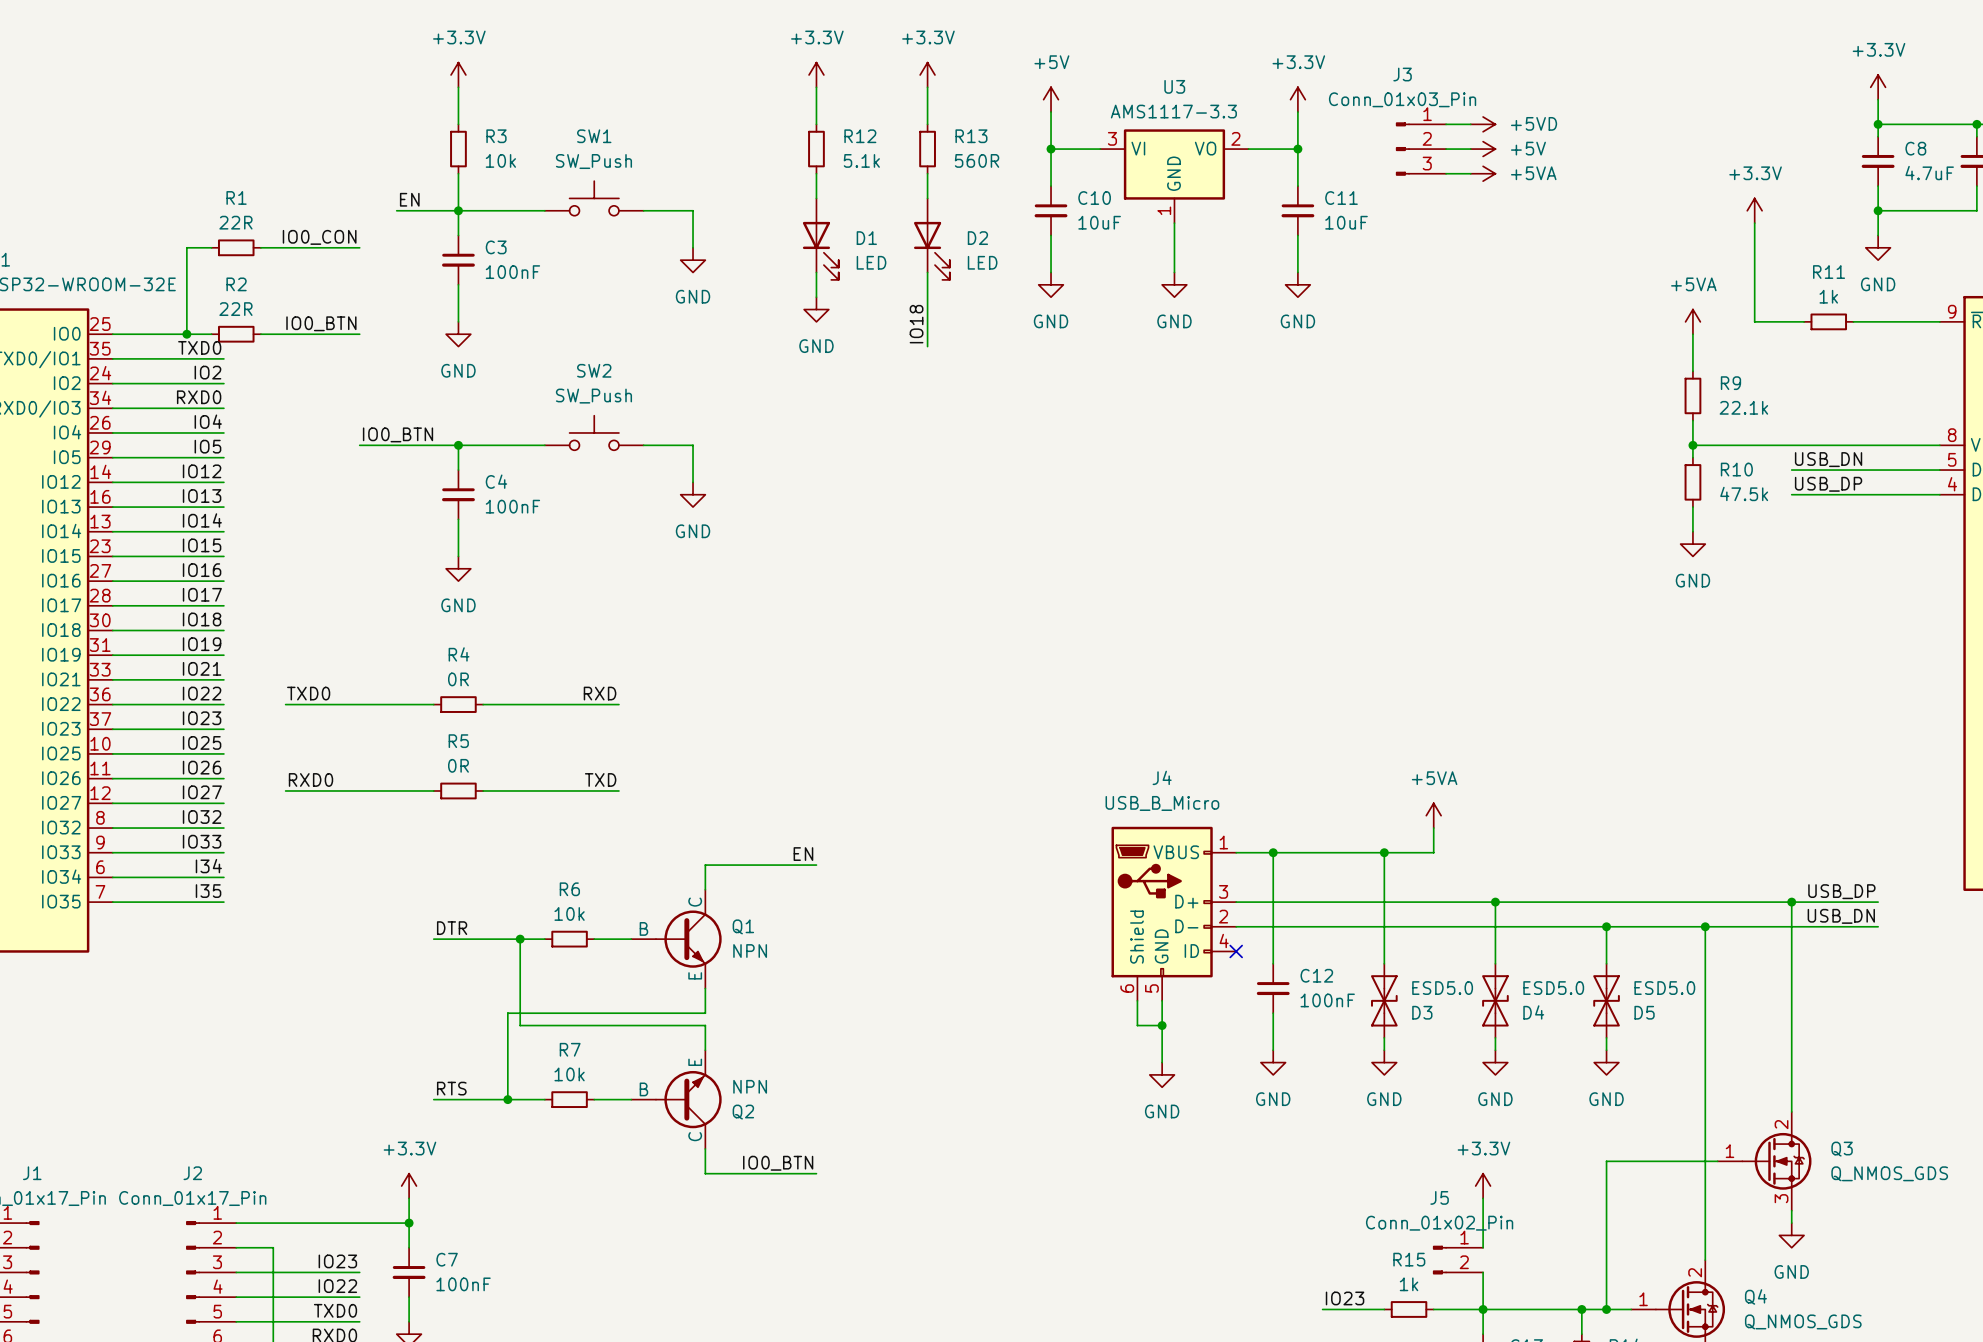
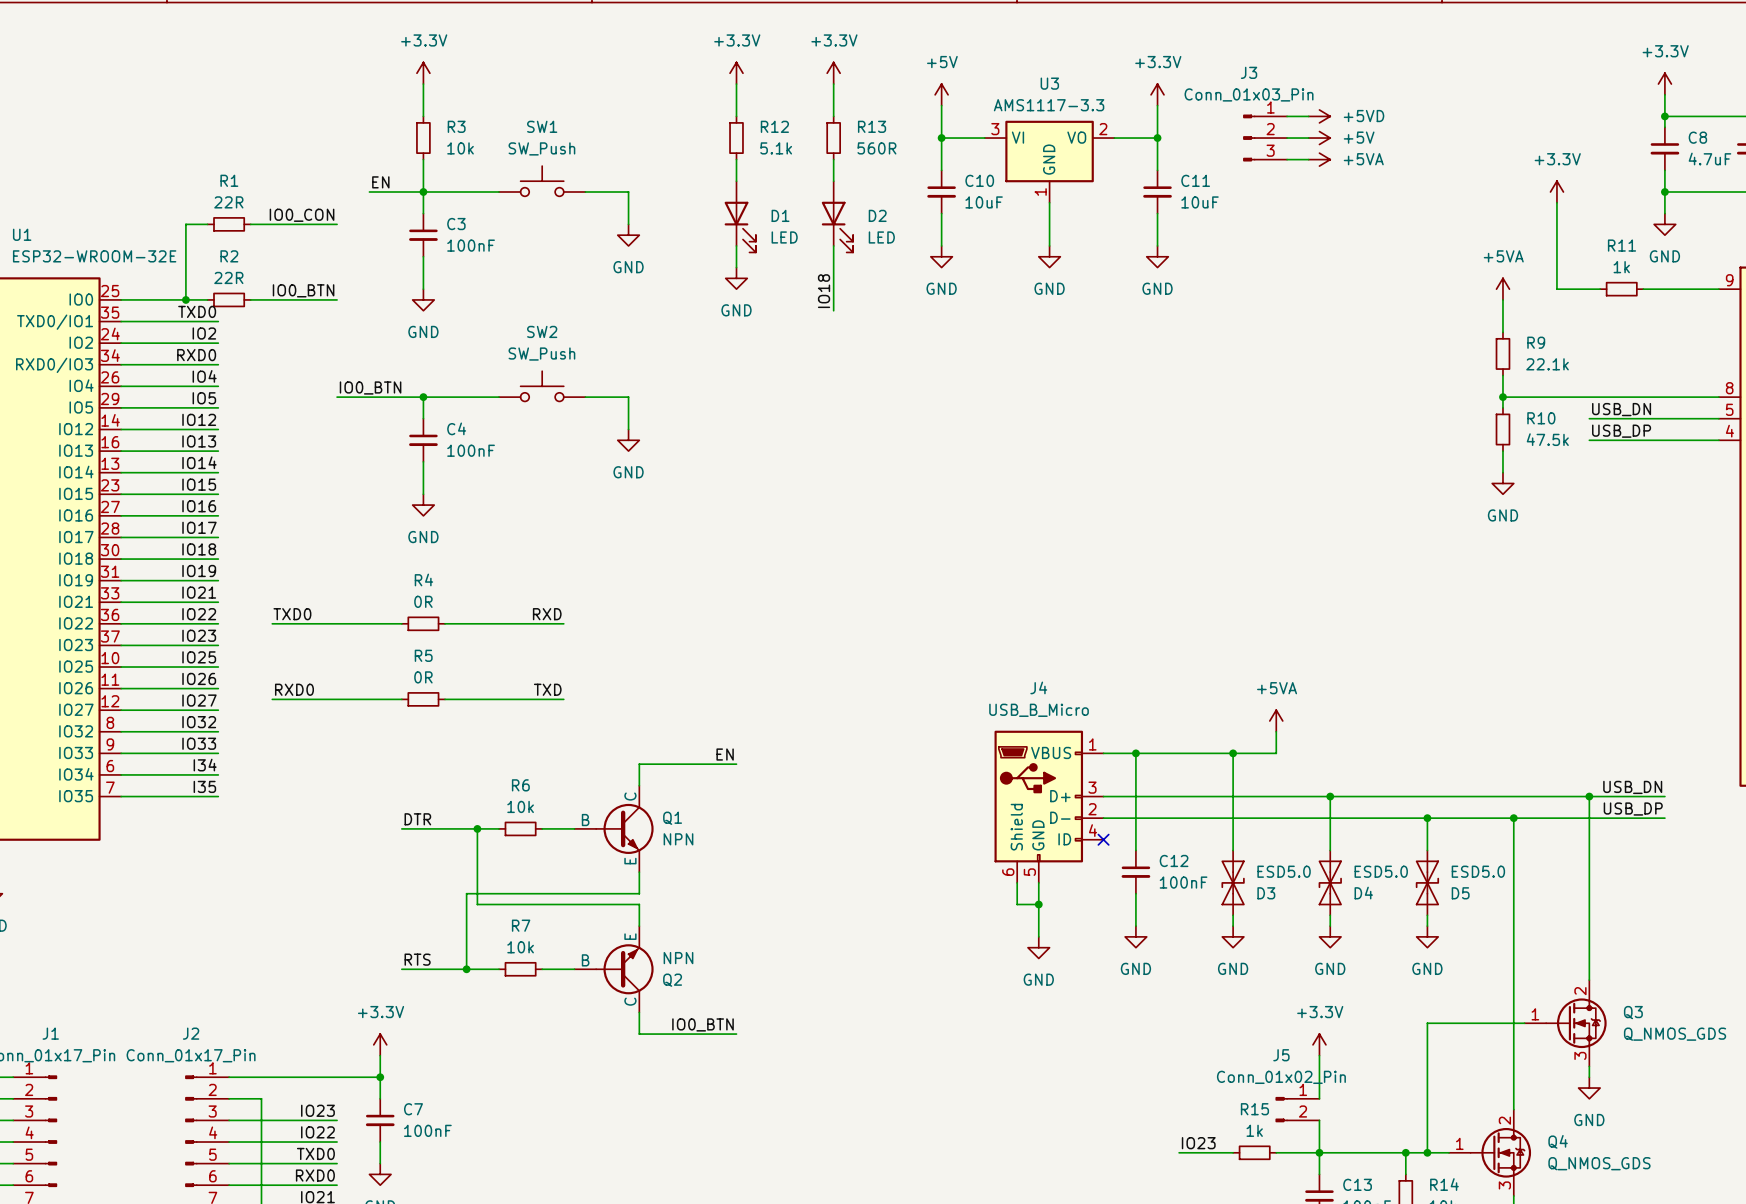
label: USB_DP (1841, 891) -> USB_DN (1632, 787)
label: USB_DN (1841, 916) -> USB_DP (1633, 809)

